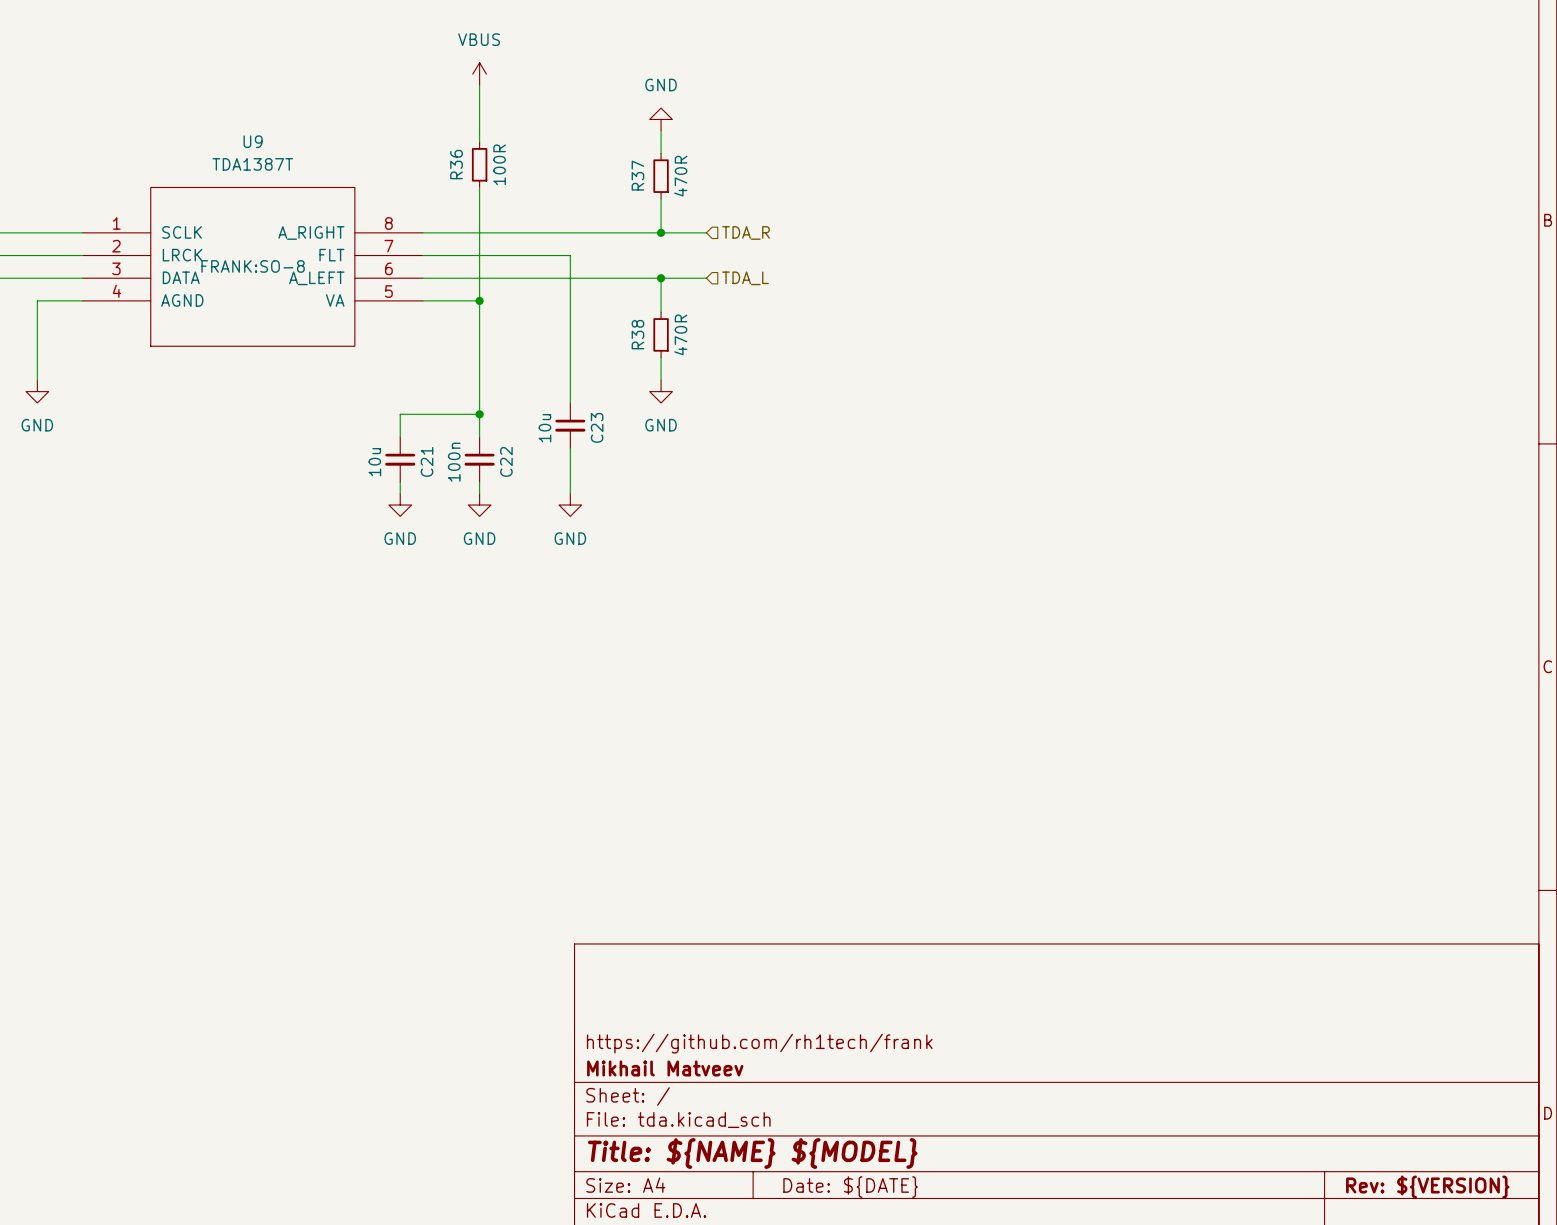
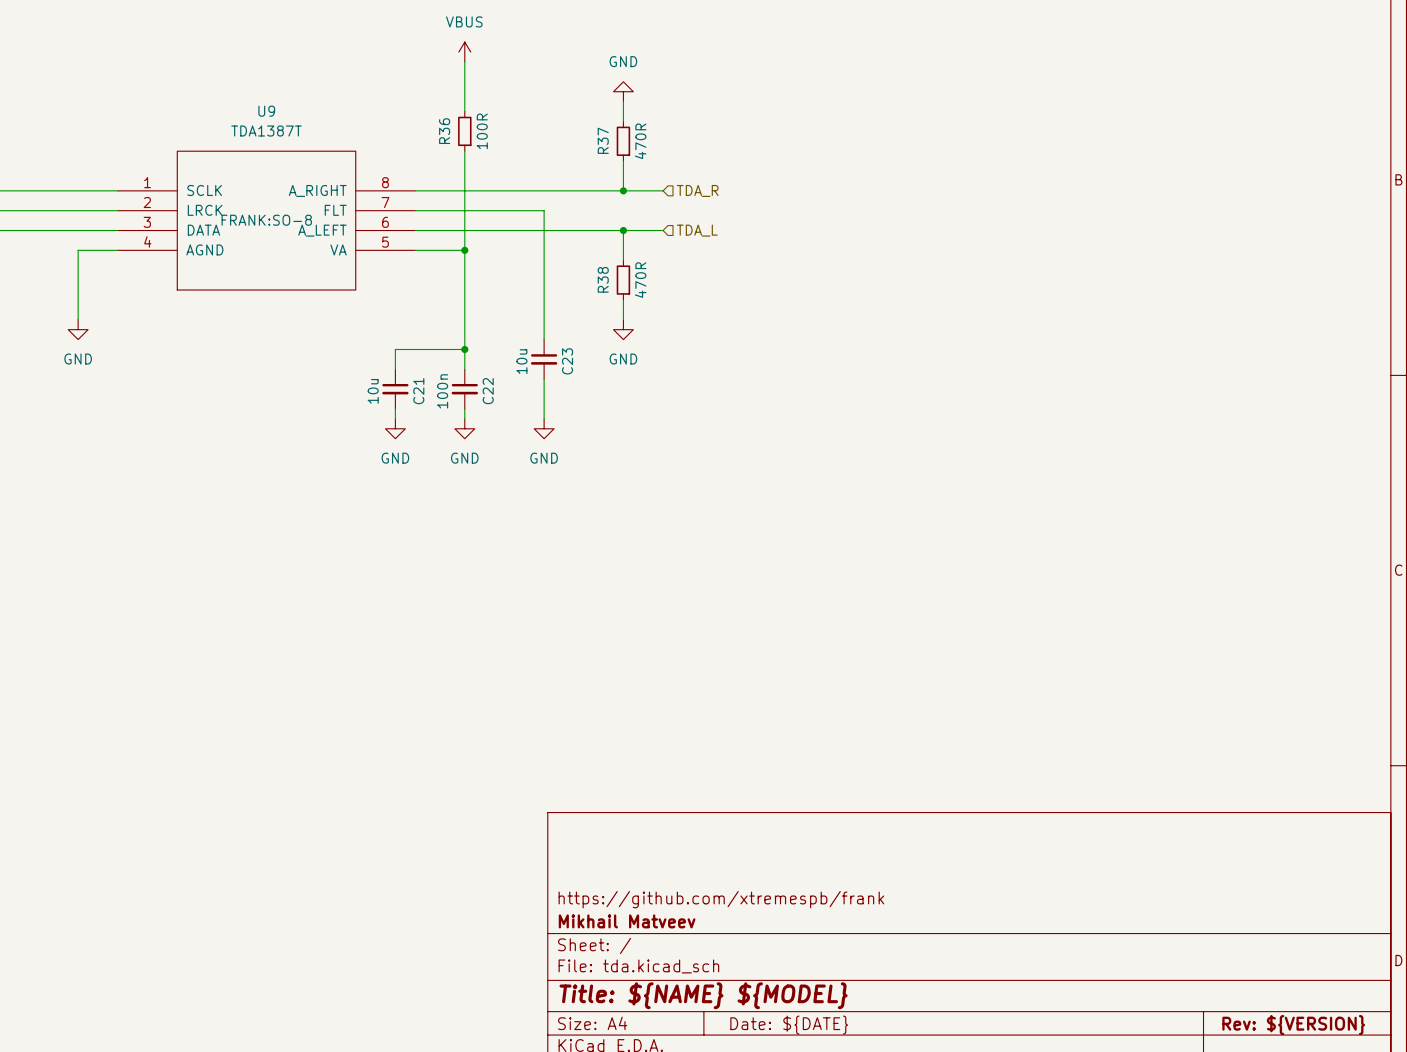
title block: https://github.com/rh1tech/frank (759, 1043) -> https://github.com/xtremespb/frank (721, 899)

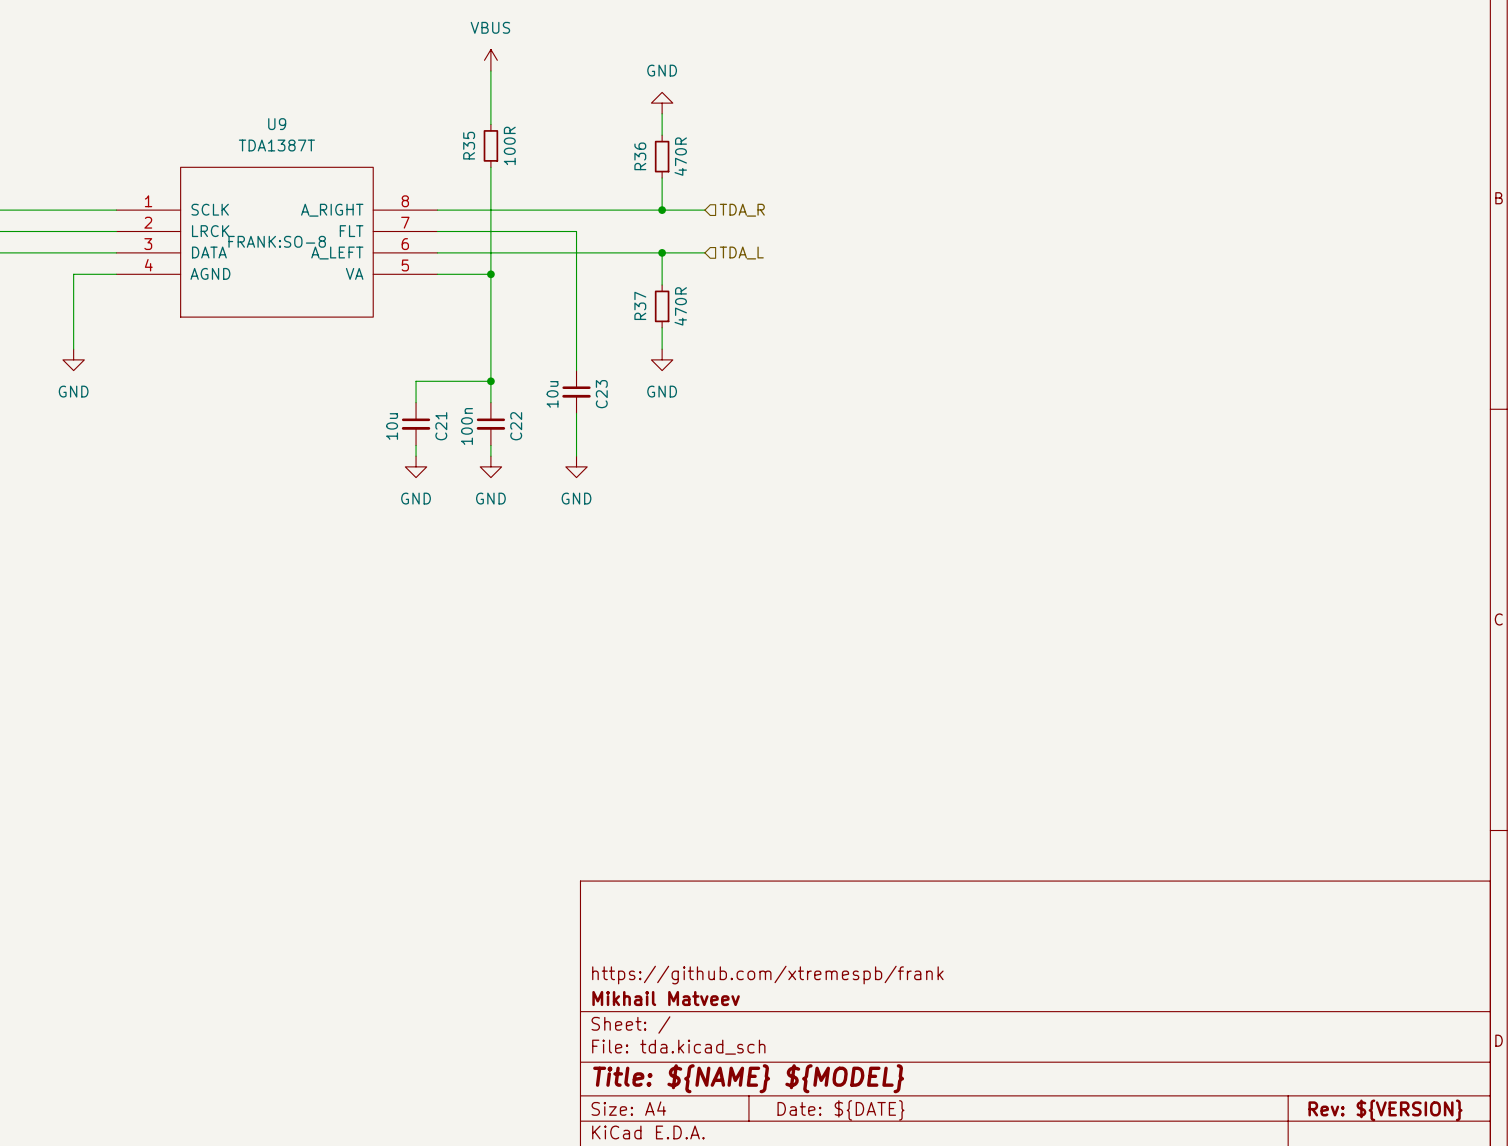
R36 name: R36 (444, 131) -> R35 (469, 145)
R37 name: R37 (603, 140) -> R36 (640, 156)
R38 name: R38 (603, 279) -> R37 (640, 305)

